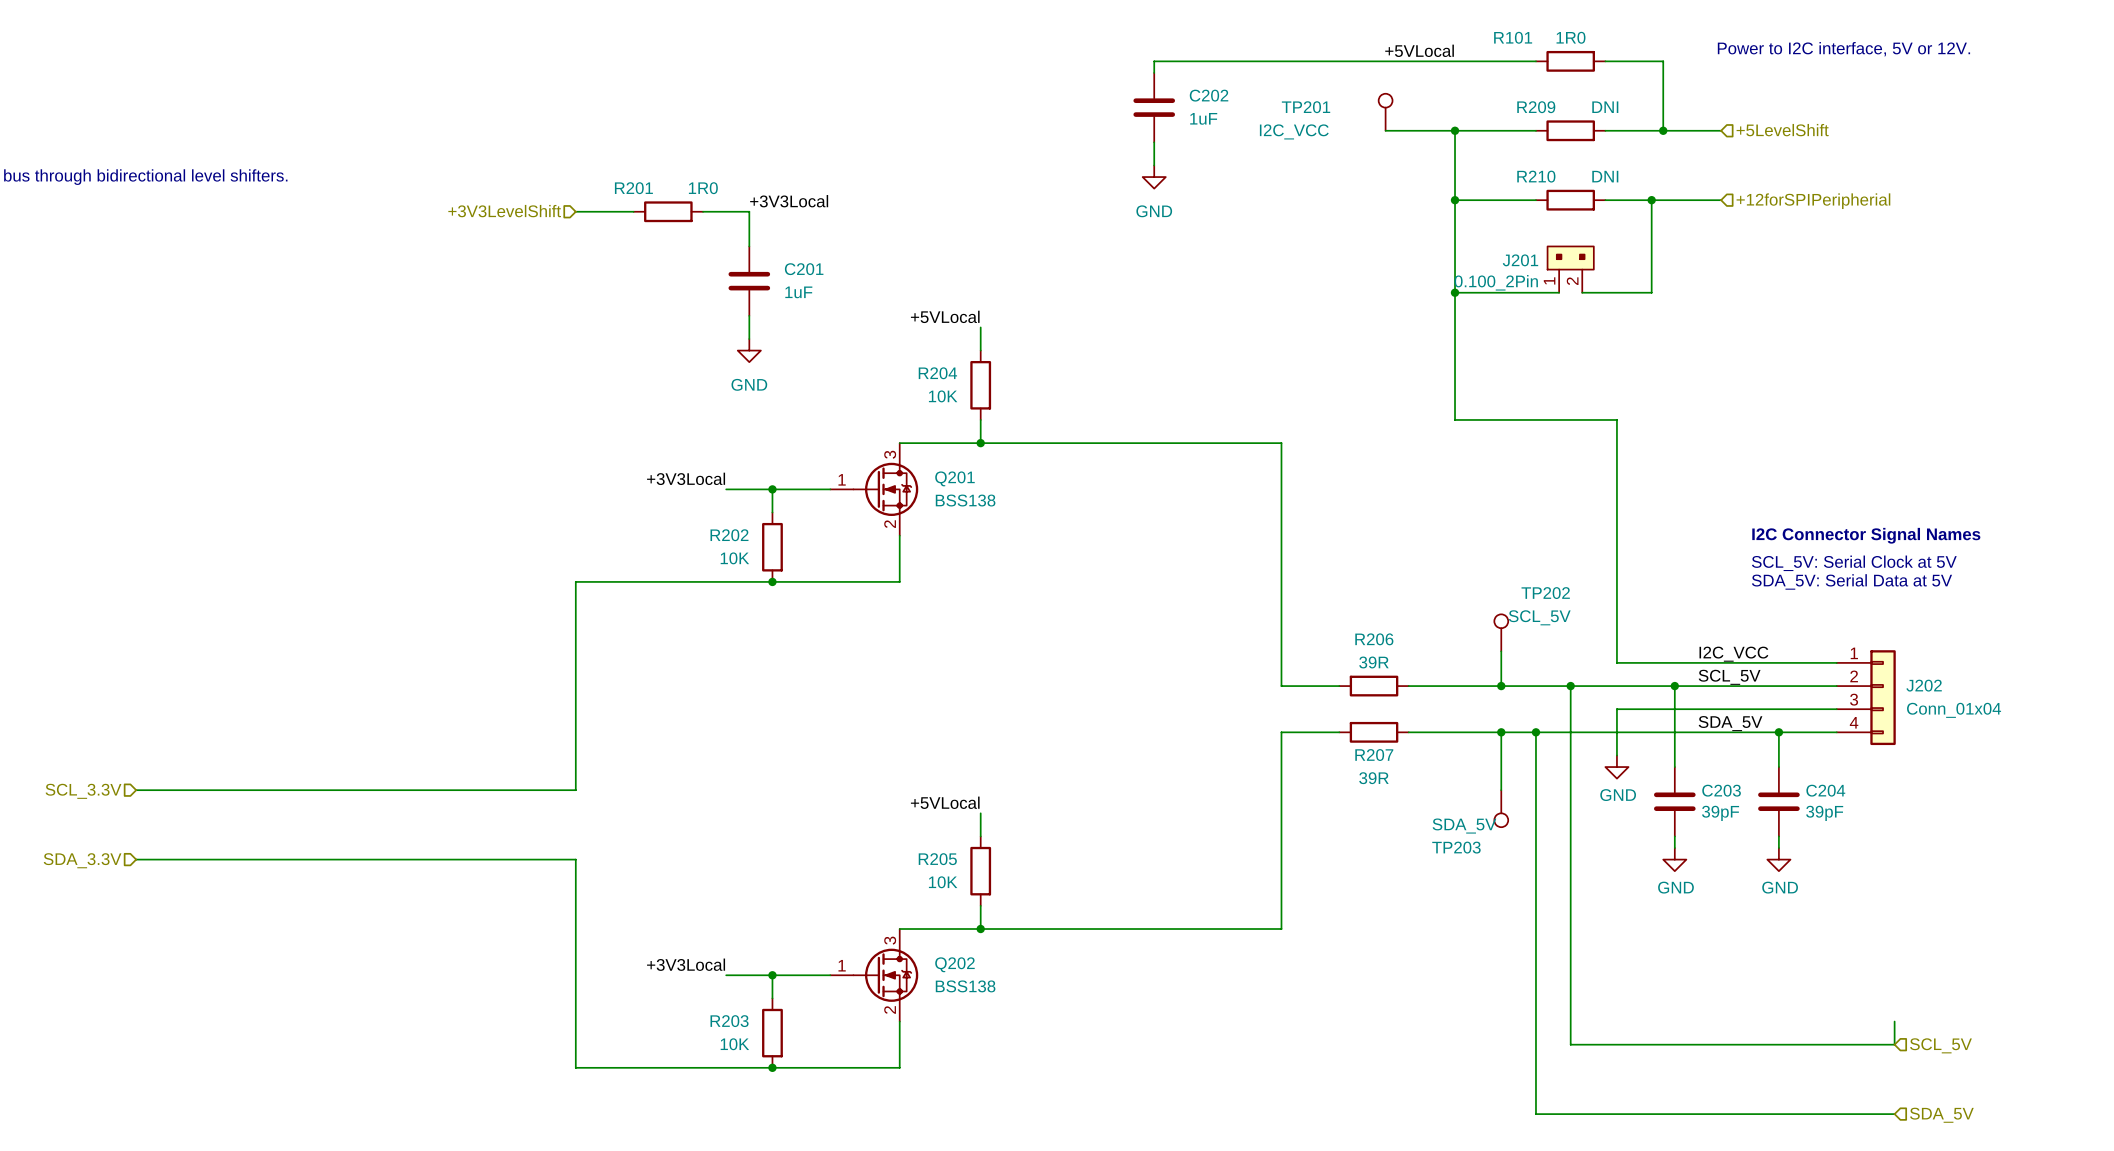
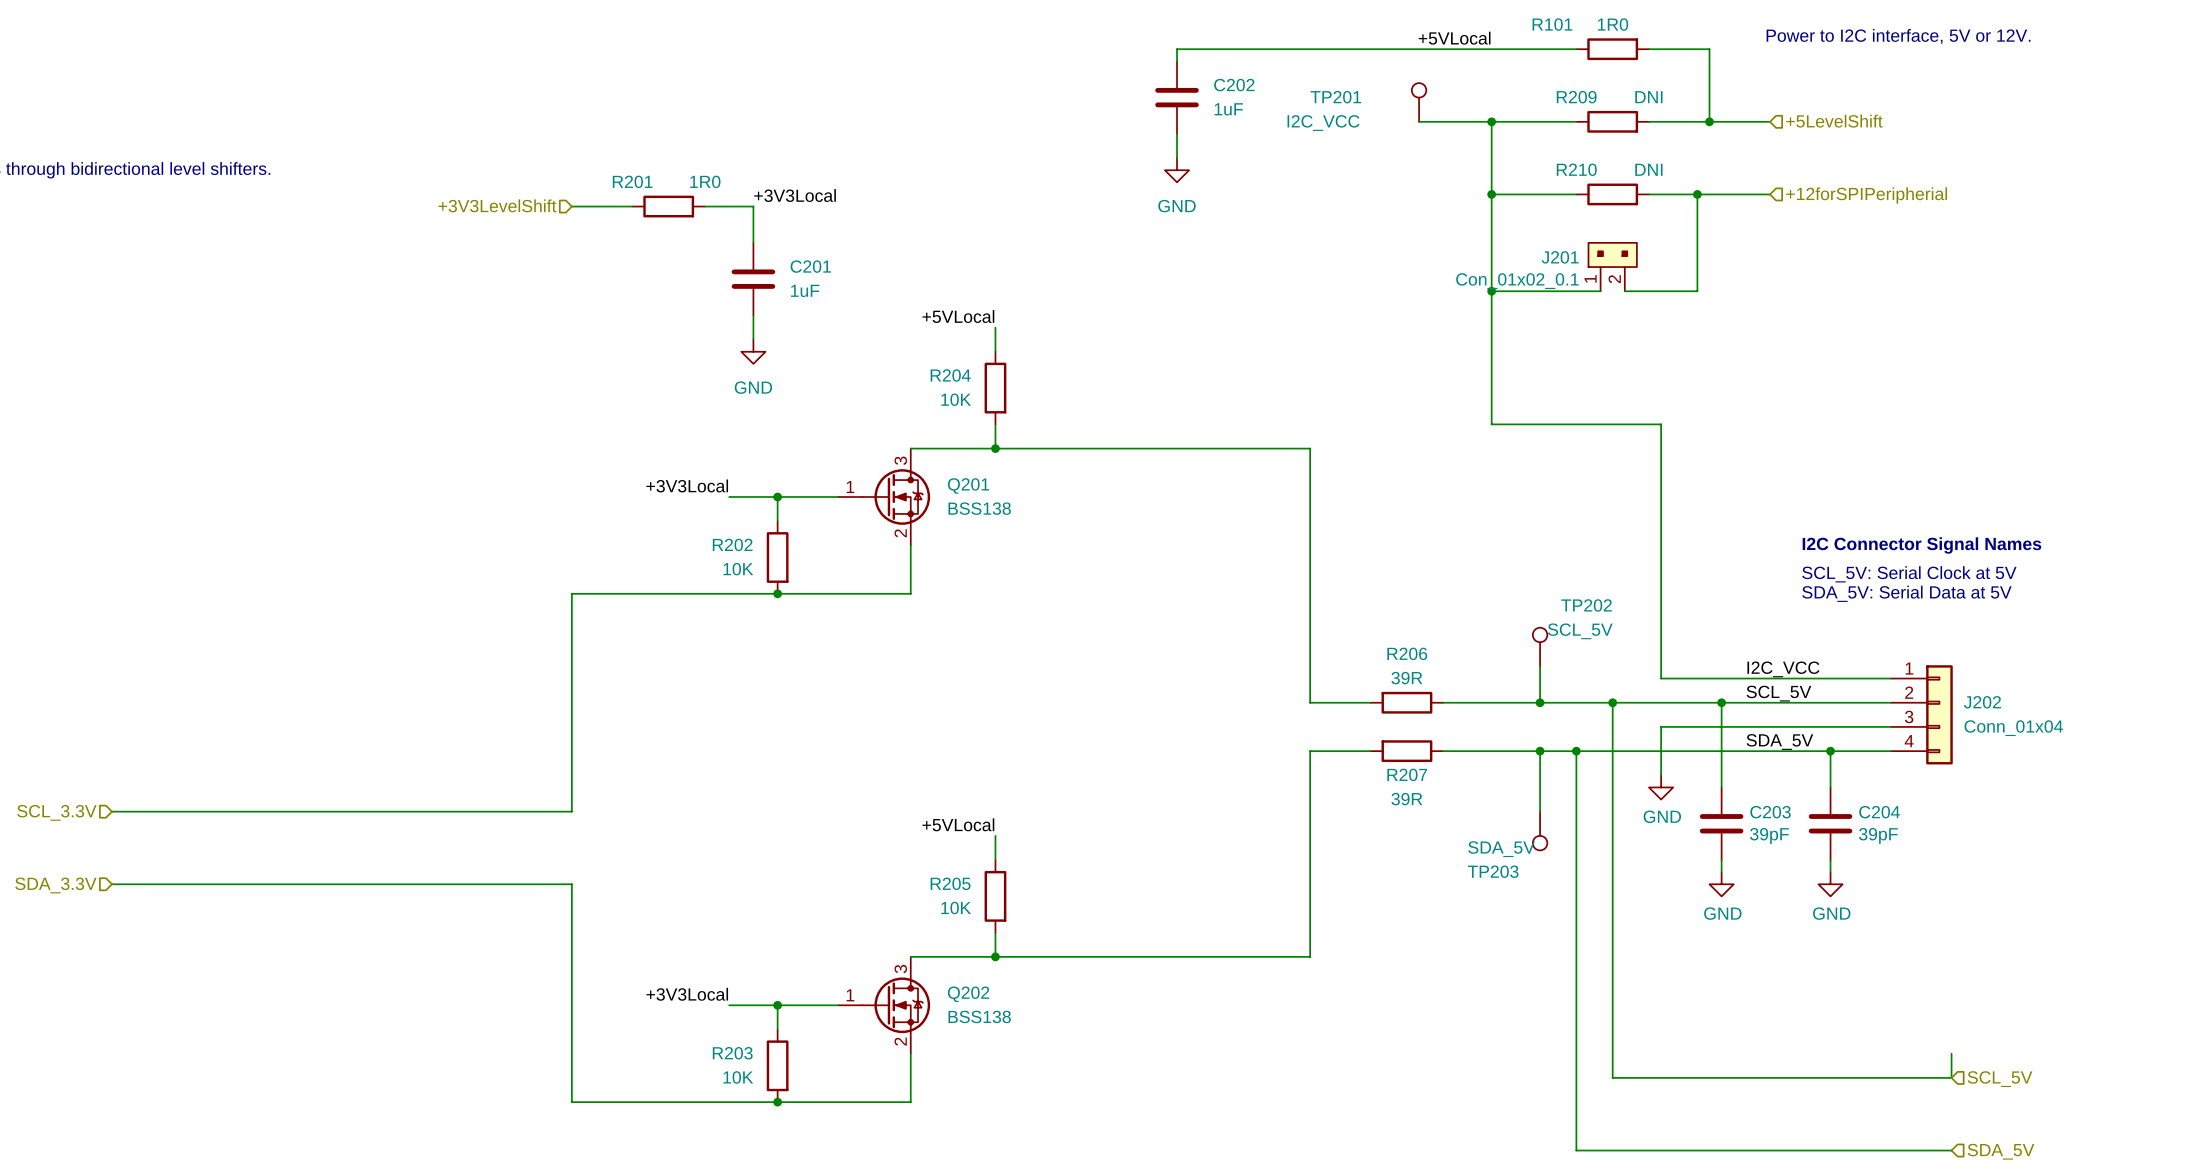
J201 value: 0.100_2Pin (1496, 282) -> Con_01x02_0.1 (1517, 281)

